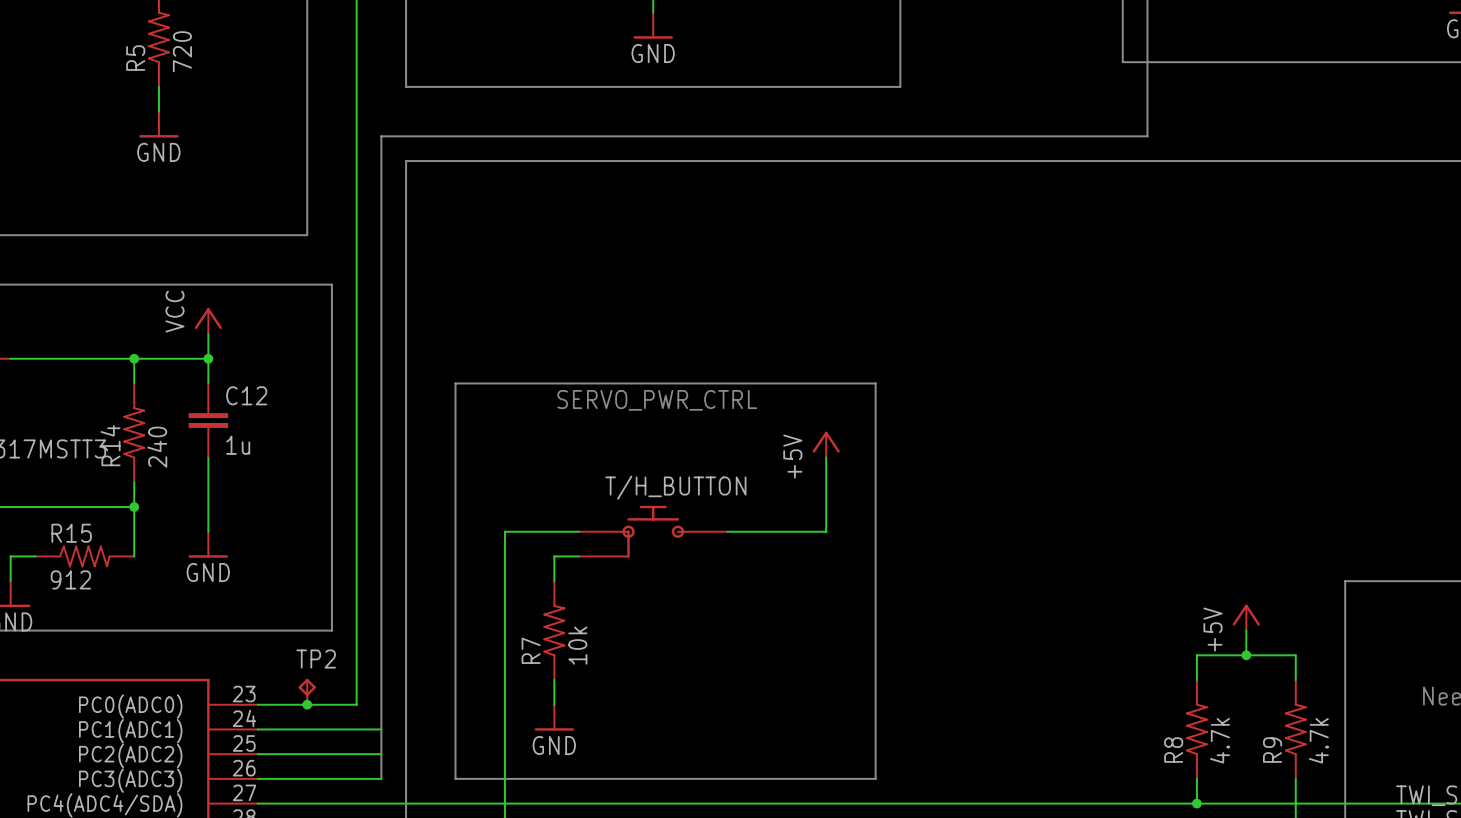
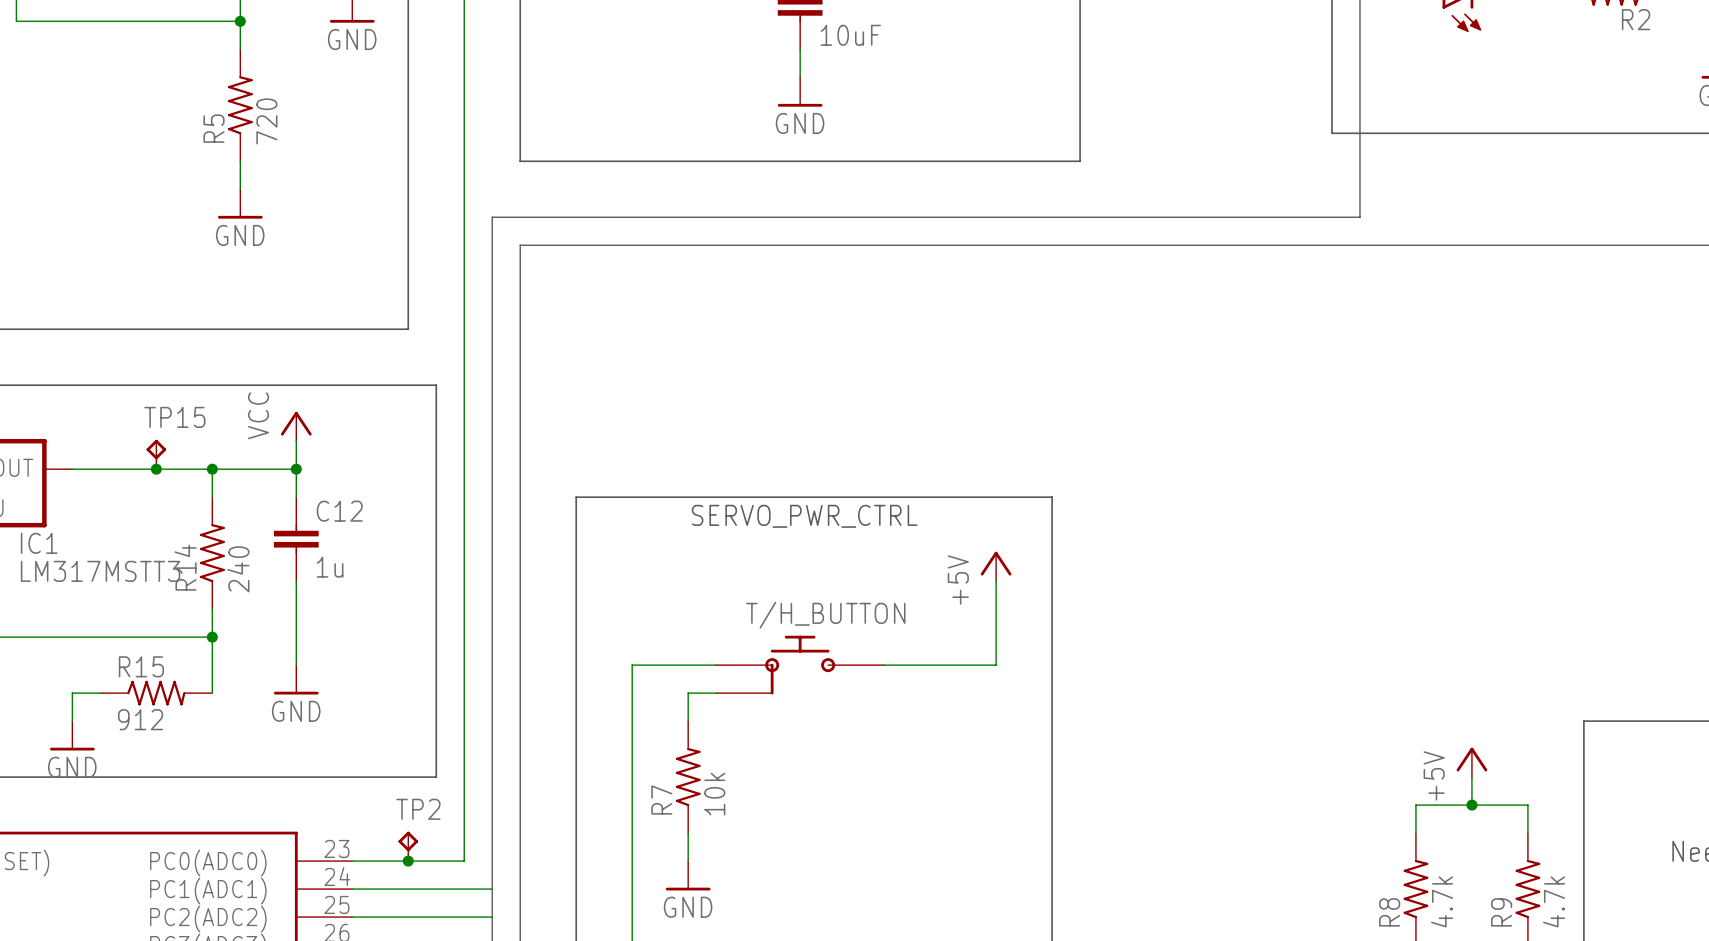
TP15: none -> (156, 454)
junction: none -> (156, 469)

